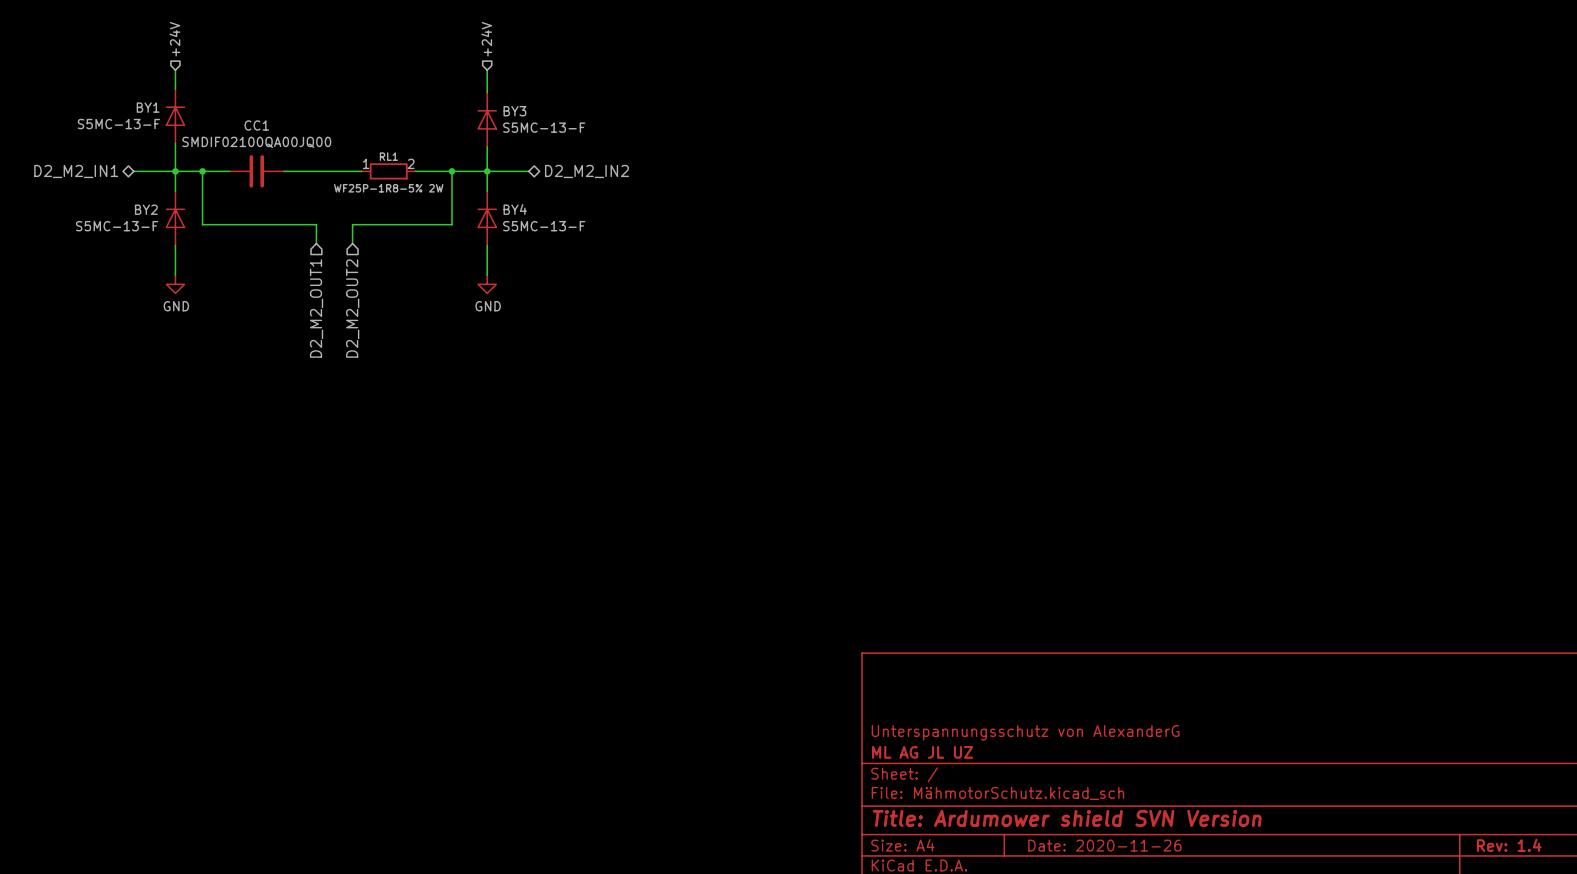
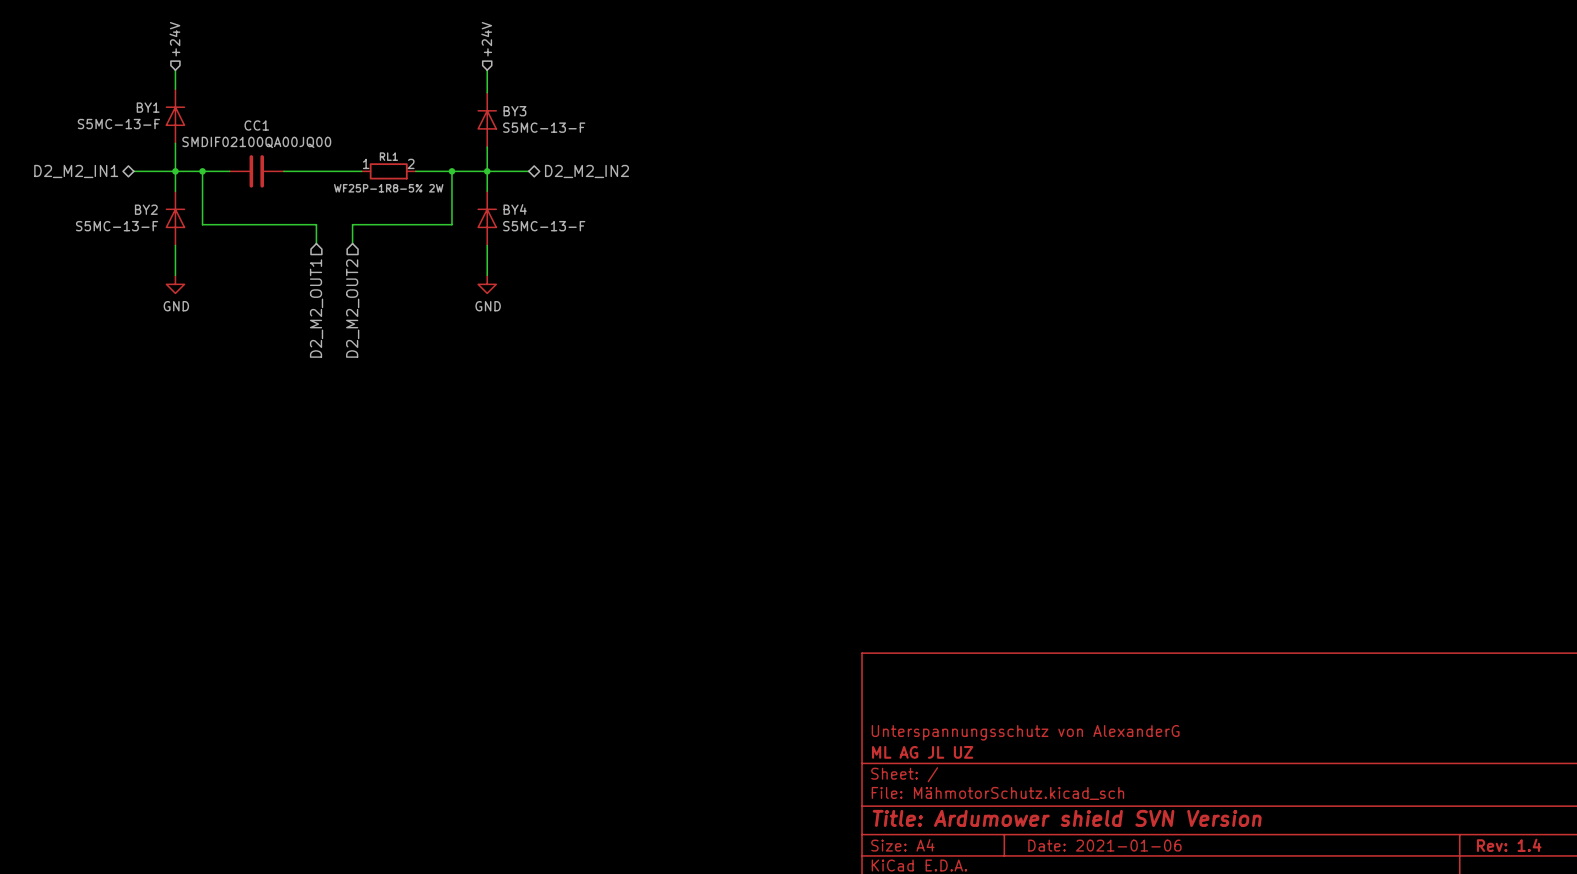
title block: Date: 2020-11-26 (1104, 845) -> Date: 2021-01-06 (1104, 845)

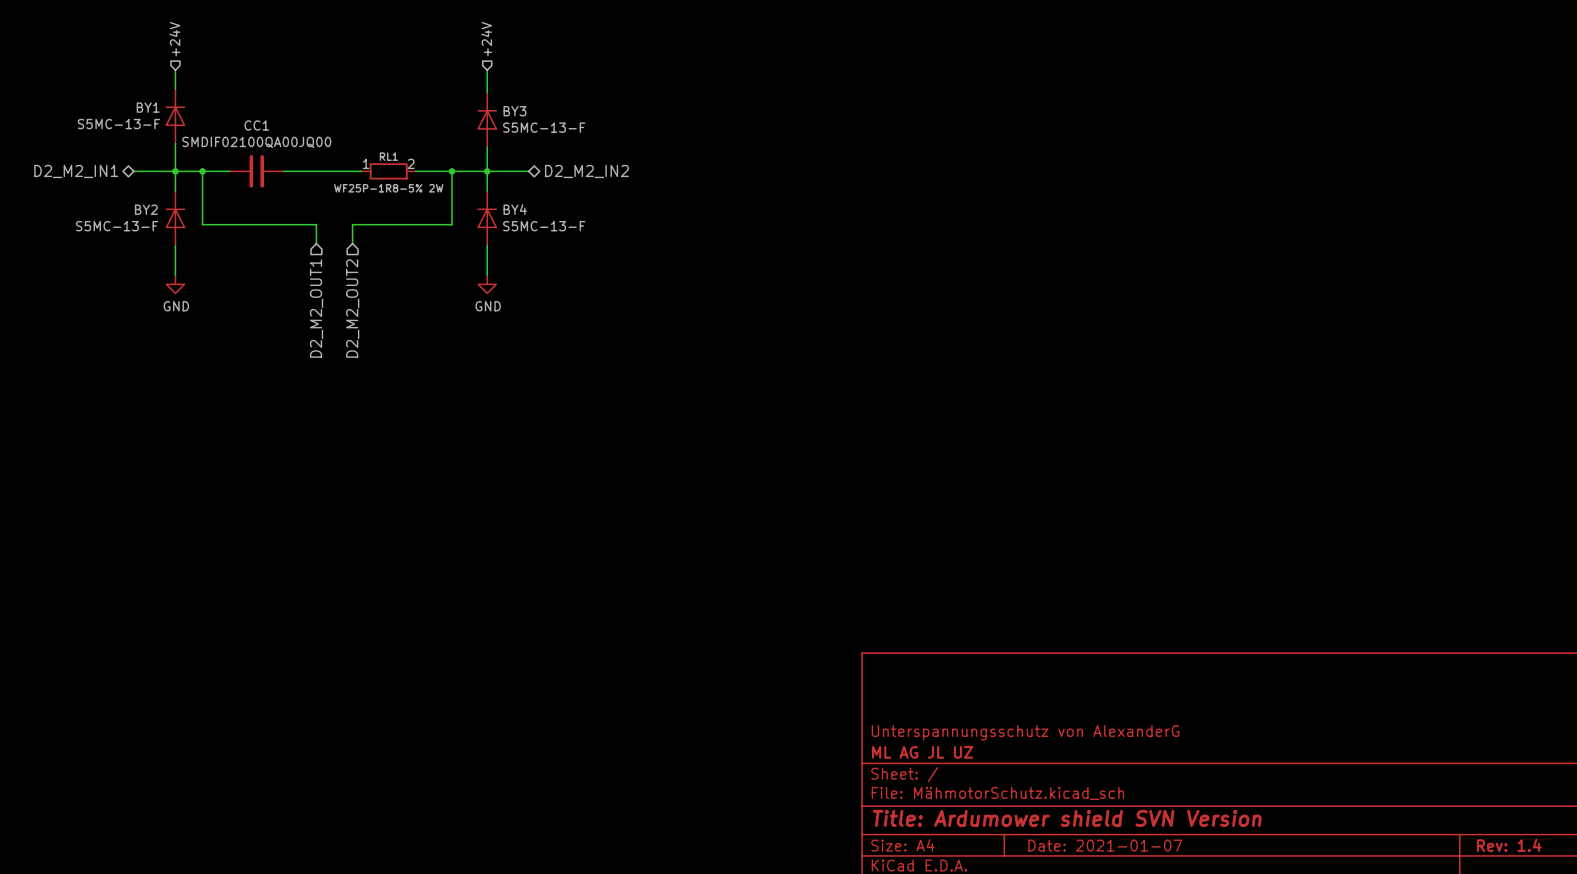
title block: Date: 2021-01-06 (1104, 845) -> Date: 2021-01-07 (1105, 845)

